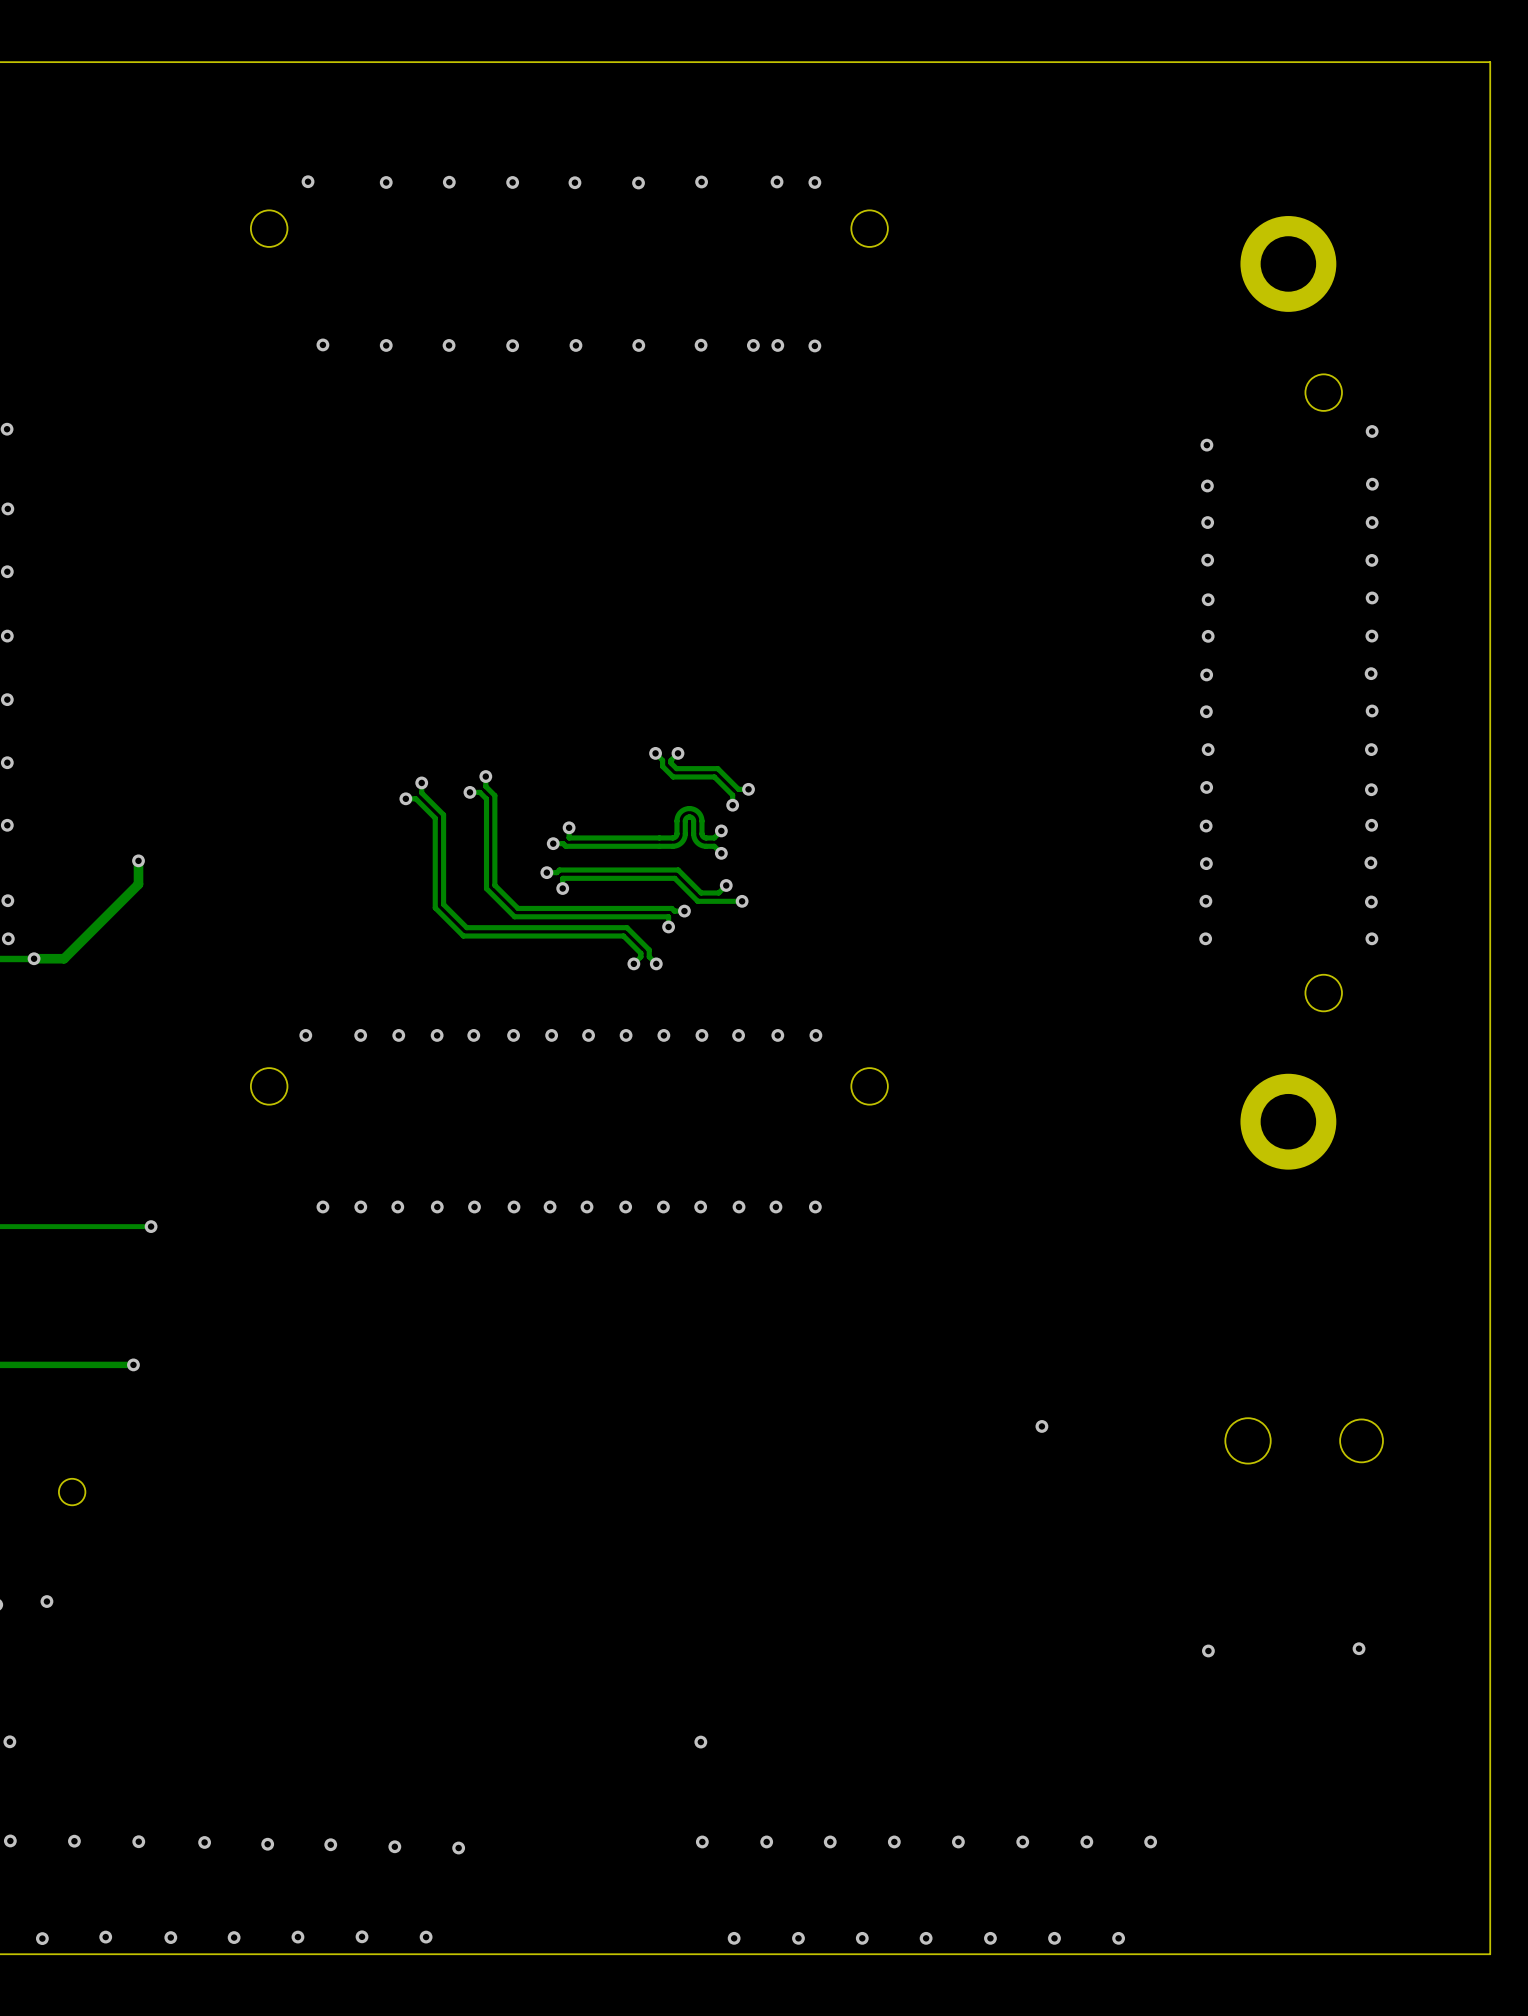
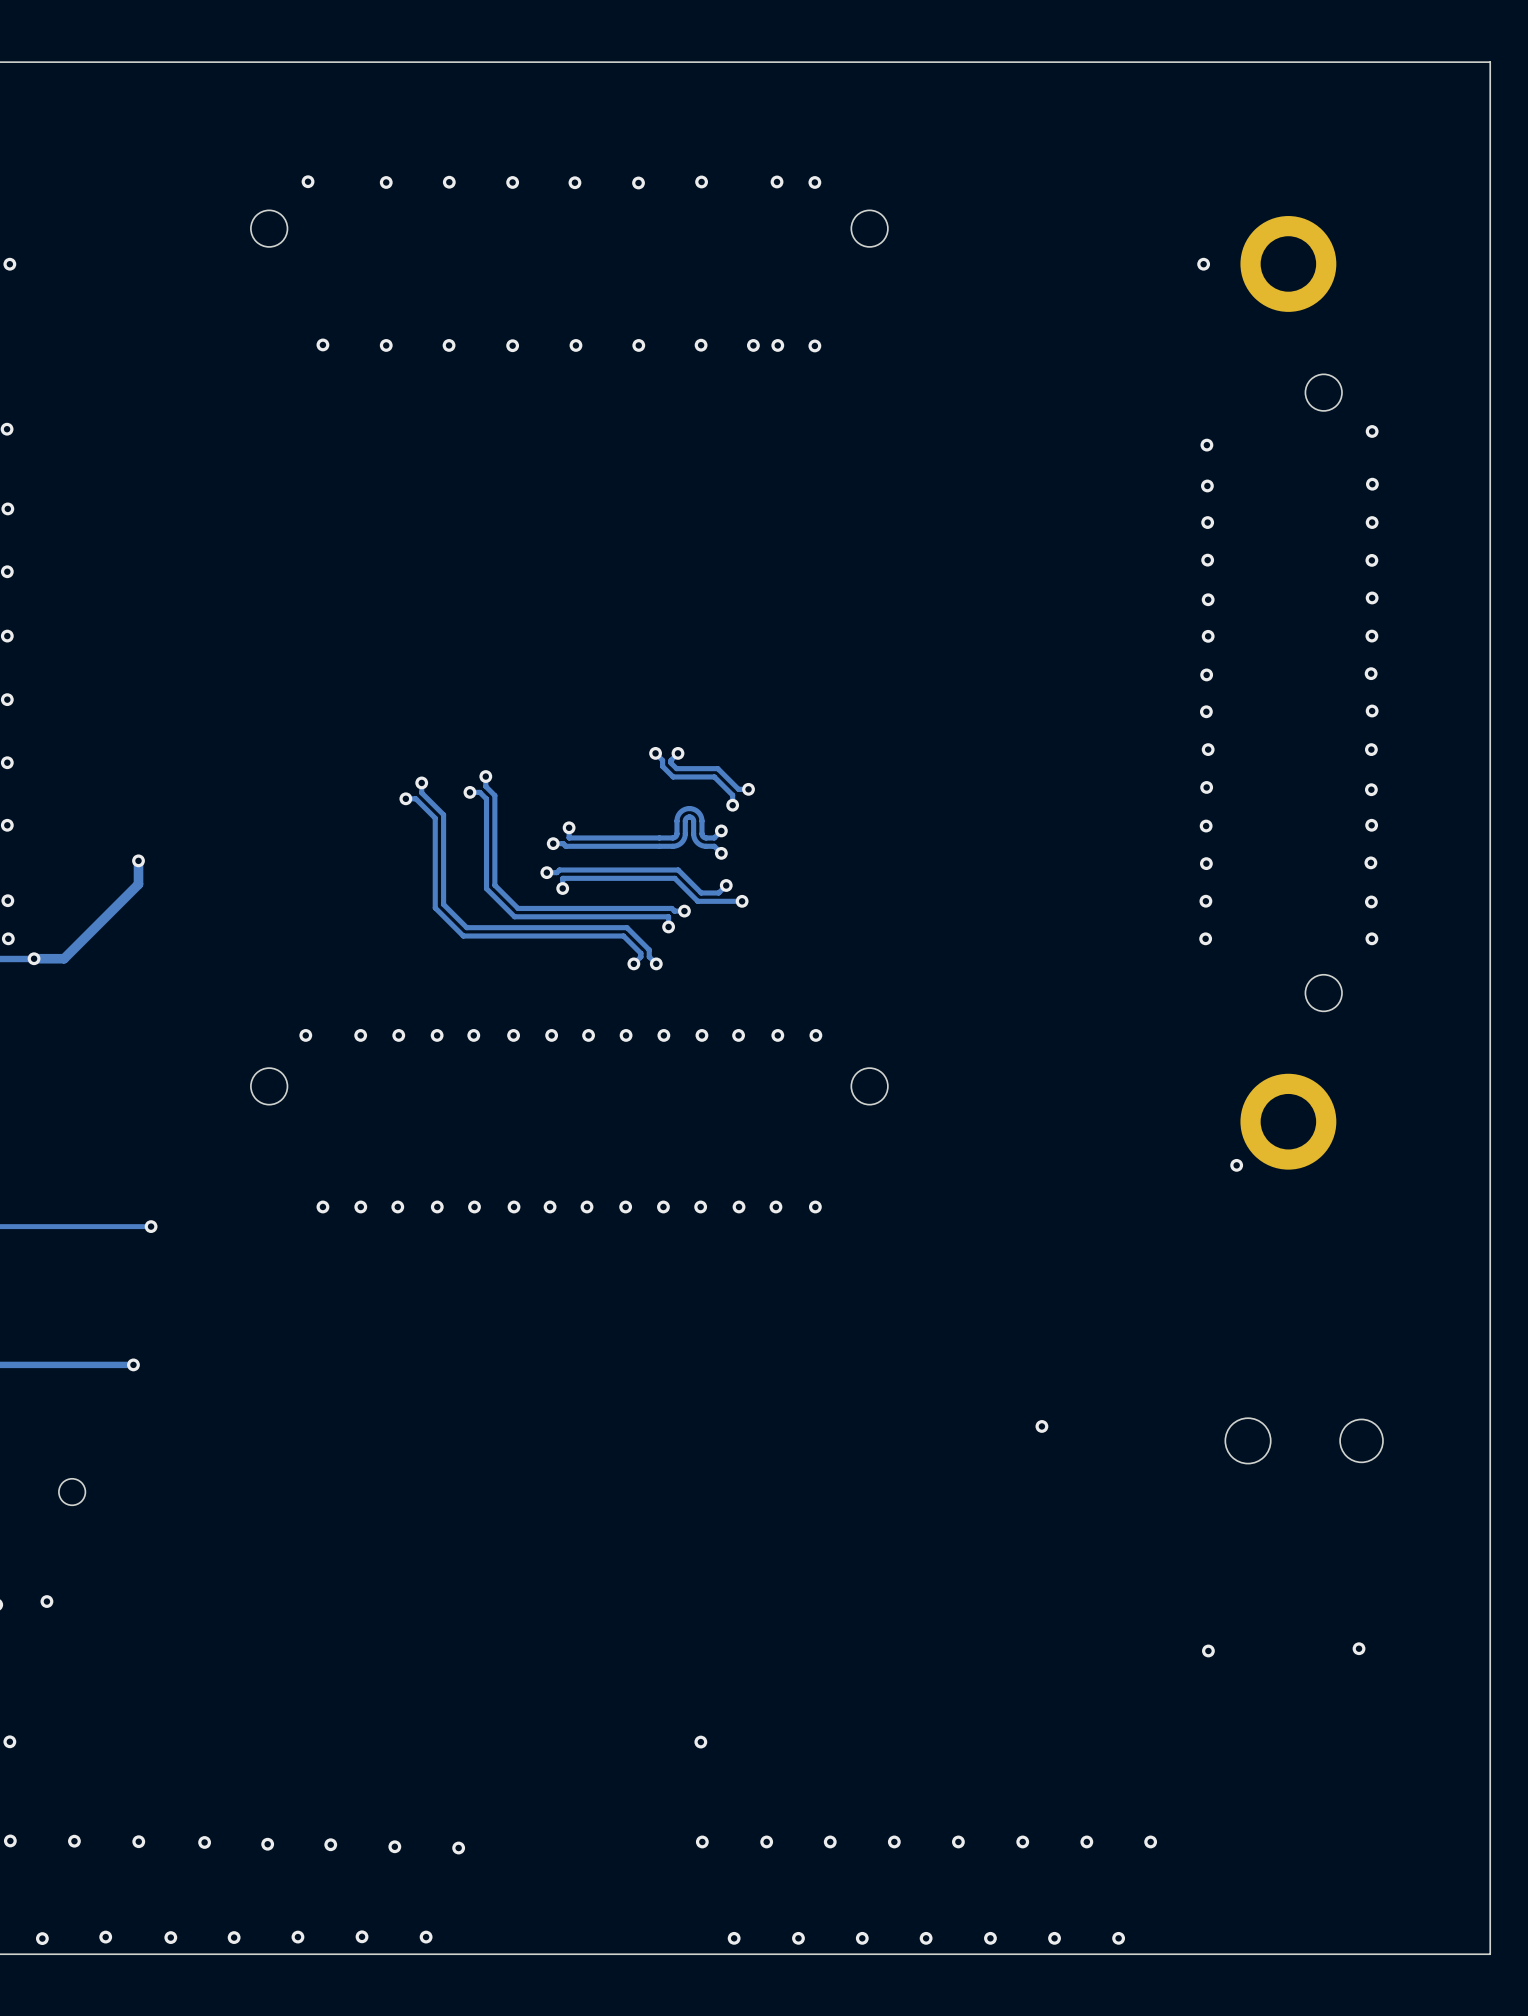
via: none -> (9, 264)
via: none -> (1203, 264)
via: none -> (1236, 1165)

